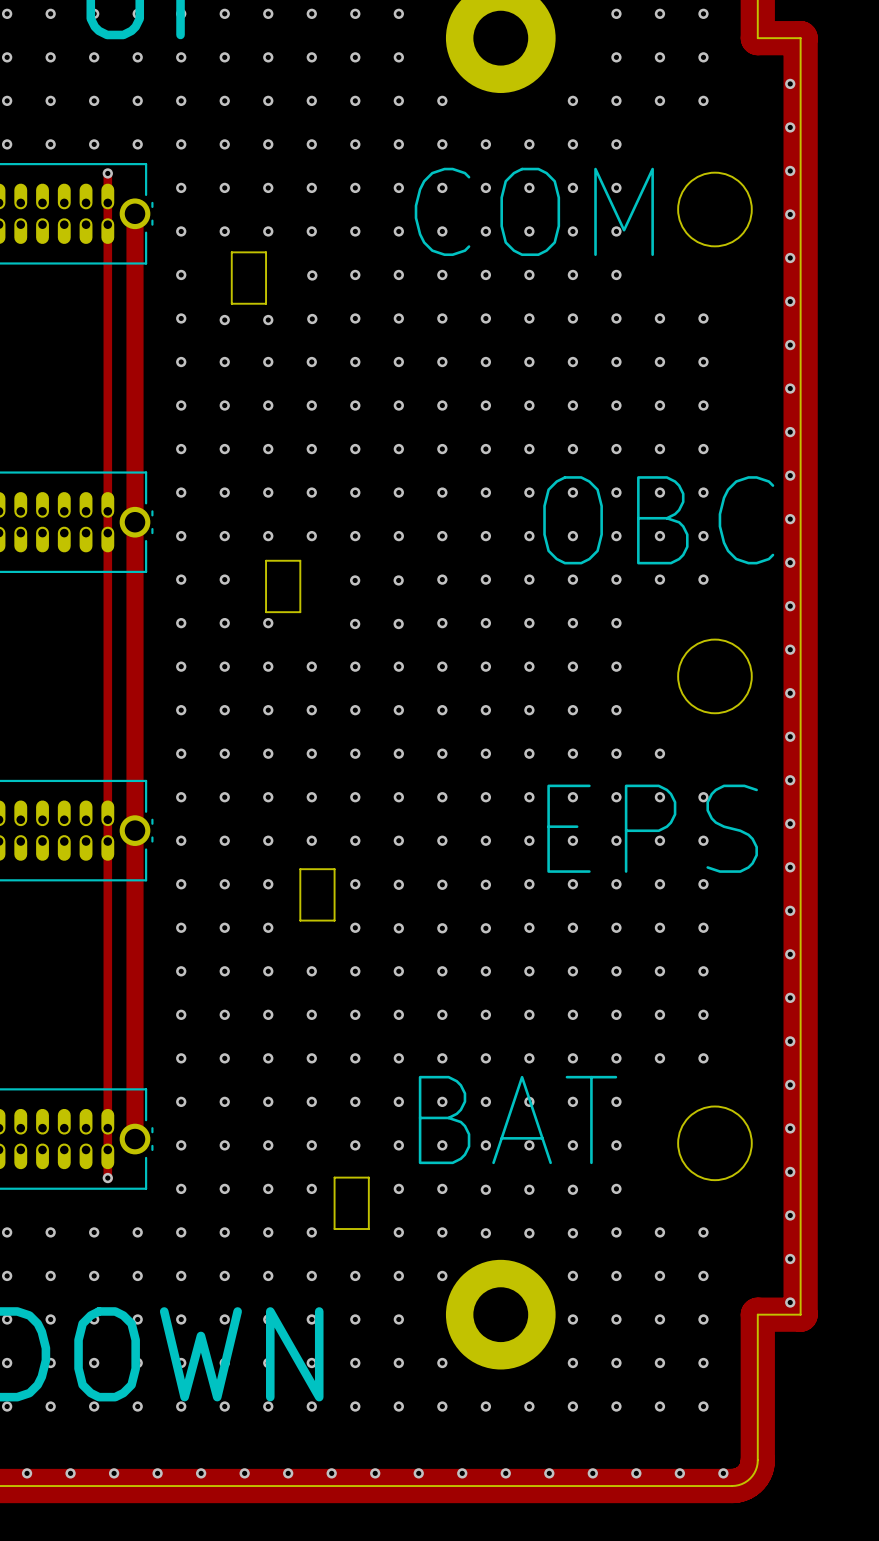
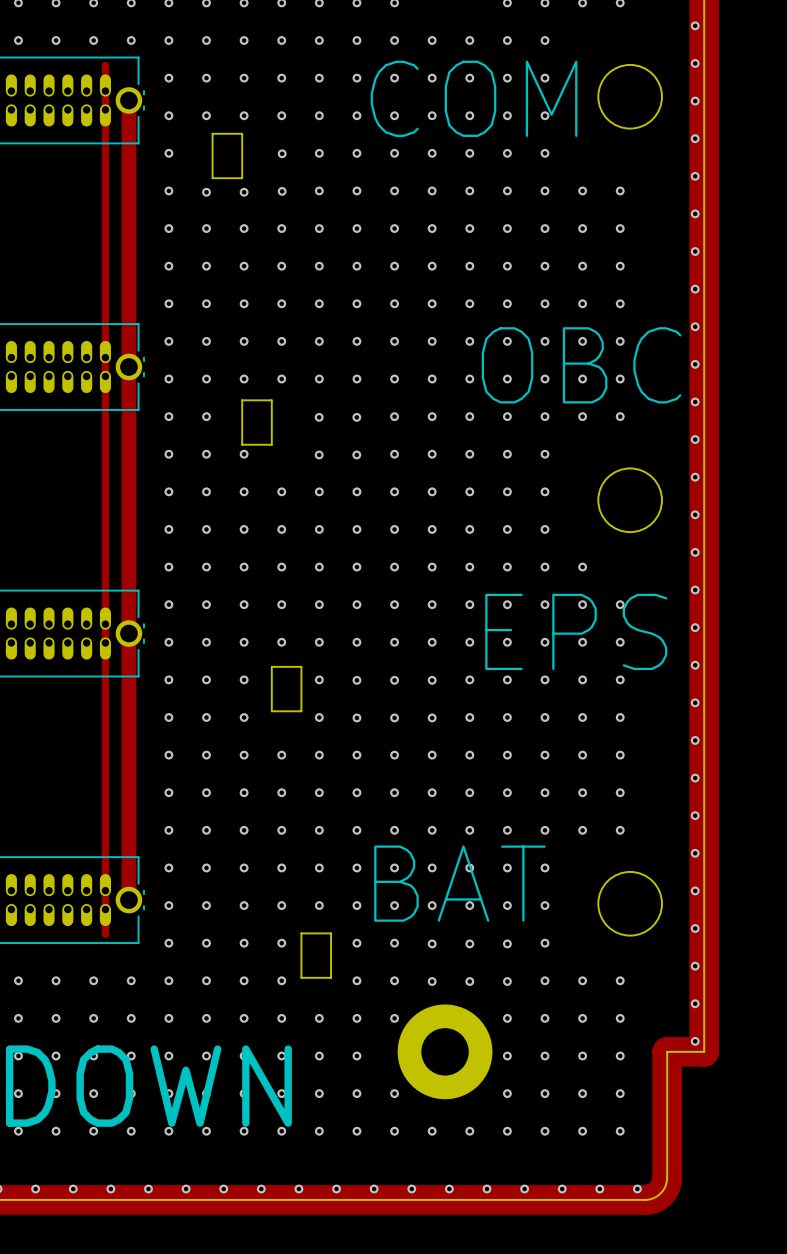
via: (107, 173) -> none
via: (107, 1178) -> none

